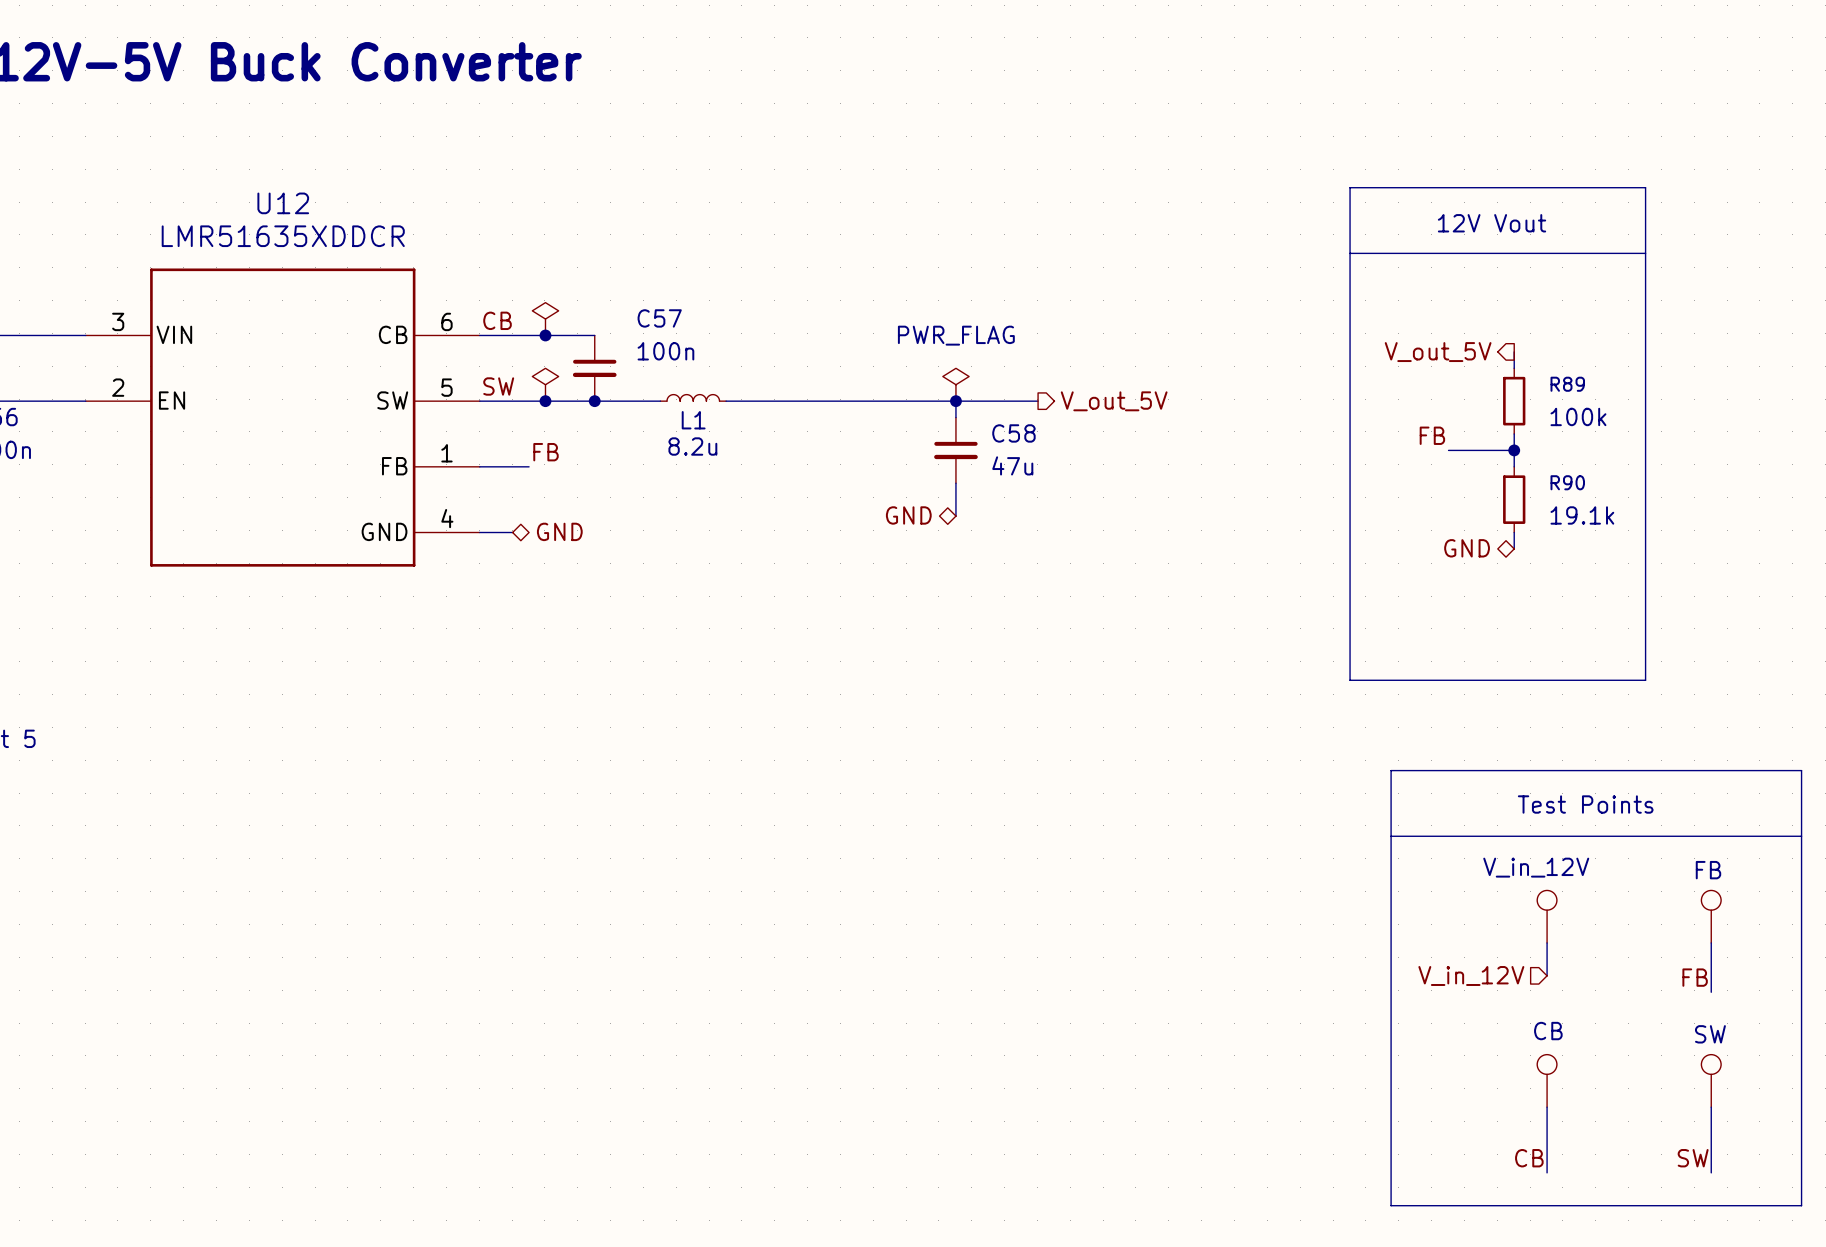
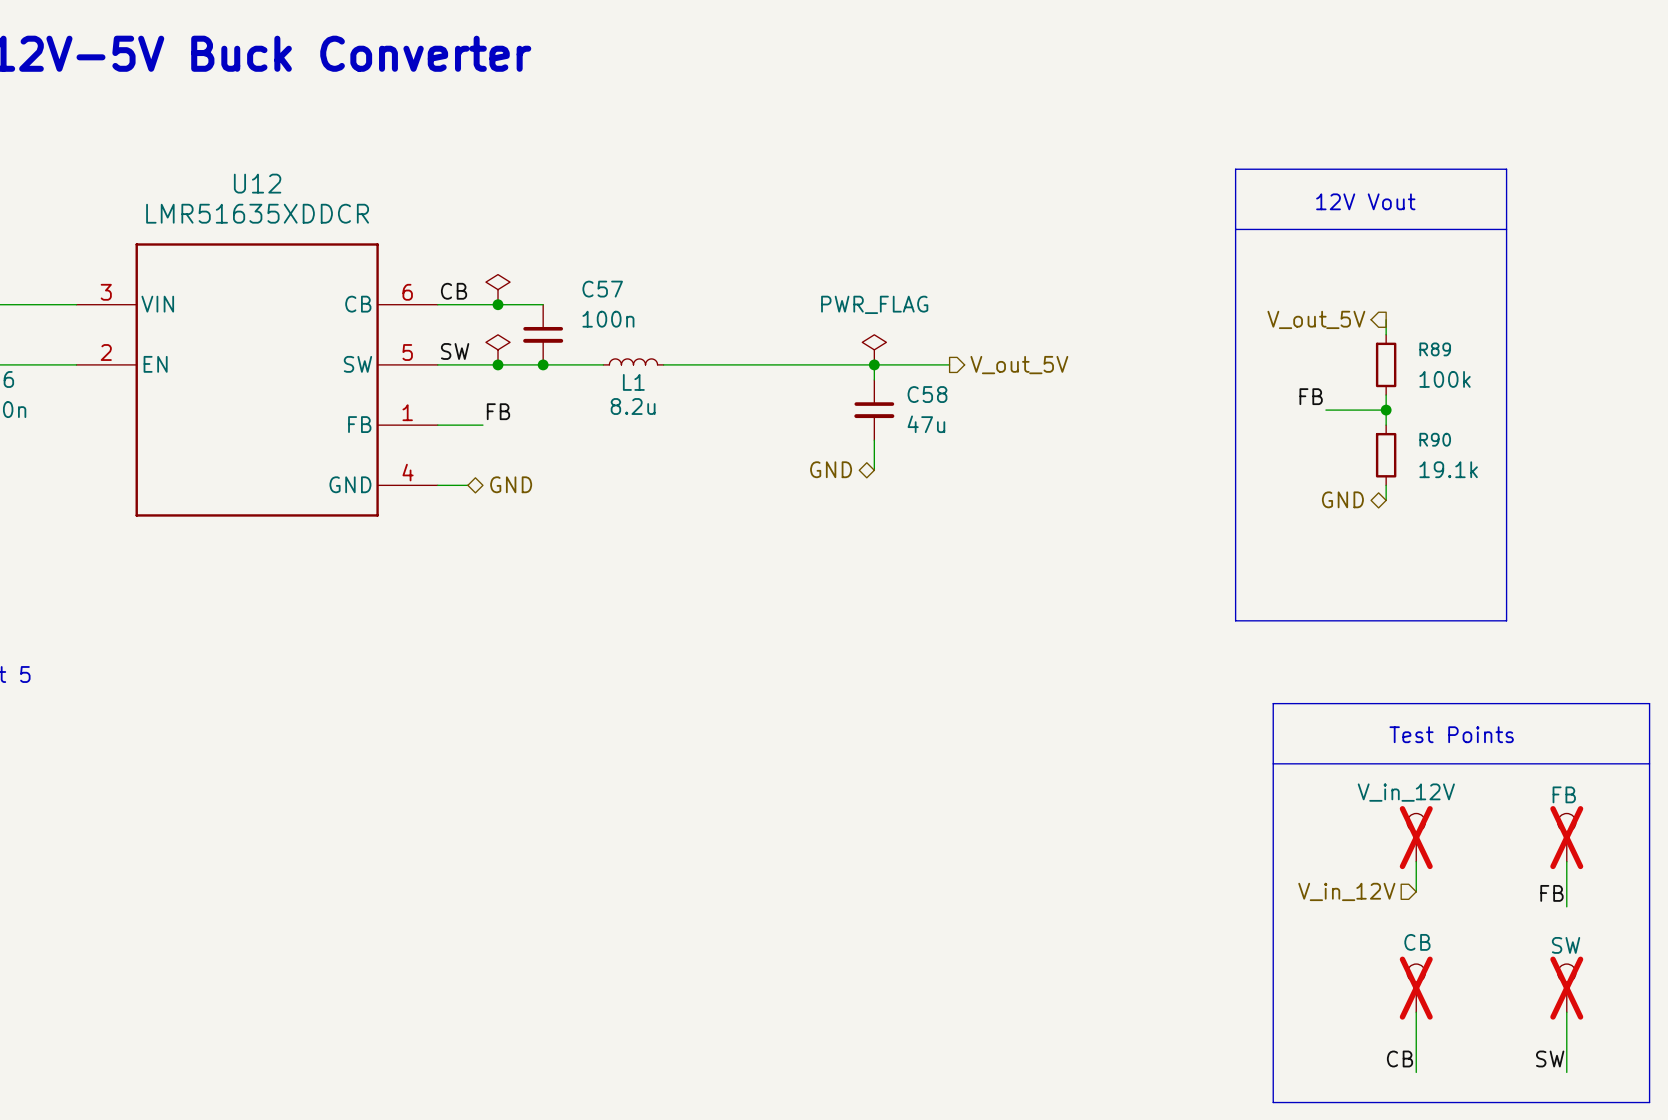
part do-not-place cross: none -> (1416, 837)
part do-not-place cross: none -> (1566, 837)
part do-not-place cross: none -> (1416, 988)
part do-not-place cross: none -> (1566, 988)

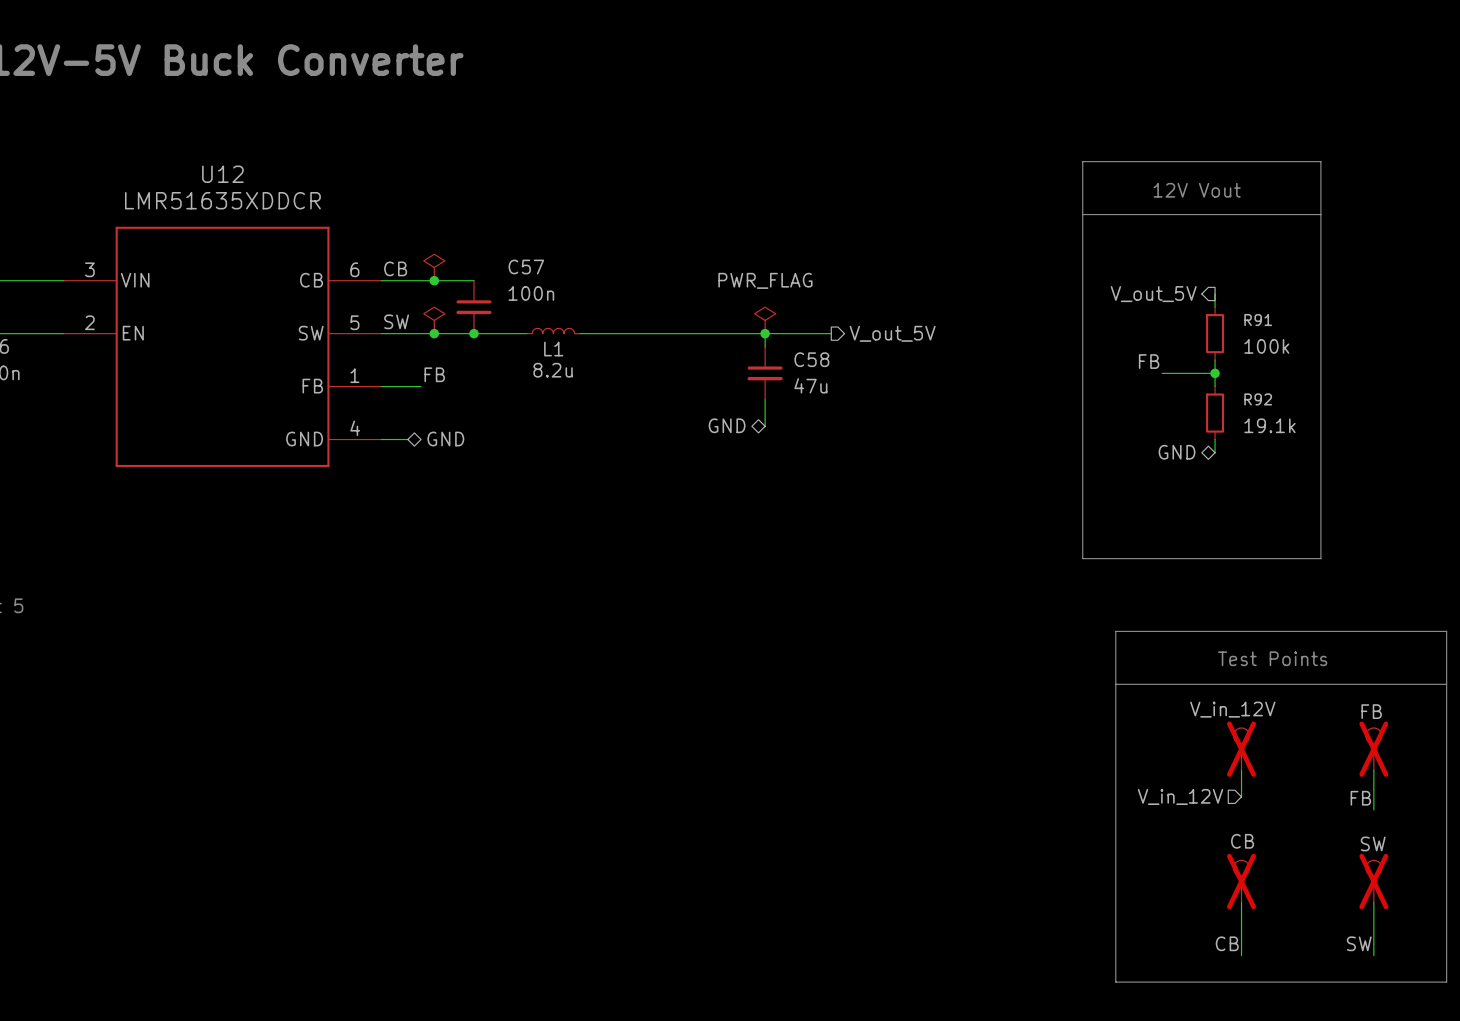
R89 name: R89 (1435, 349) -> R91 (1258, 320)
R90 name: R90 (1435, 439) -> R92 (1258, 399)

